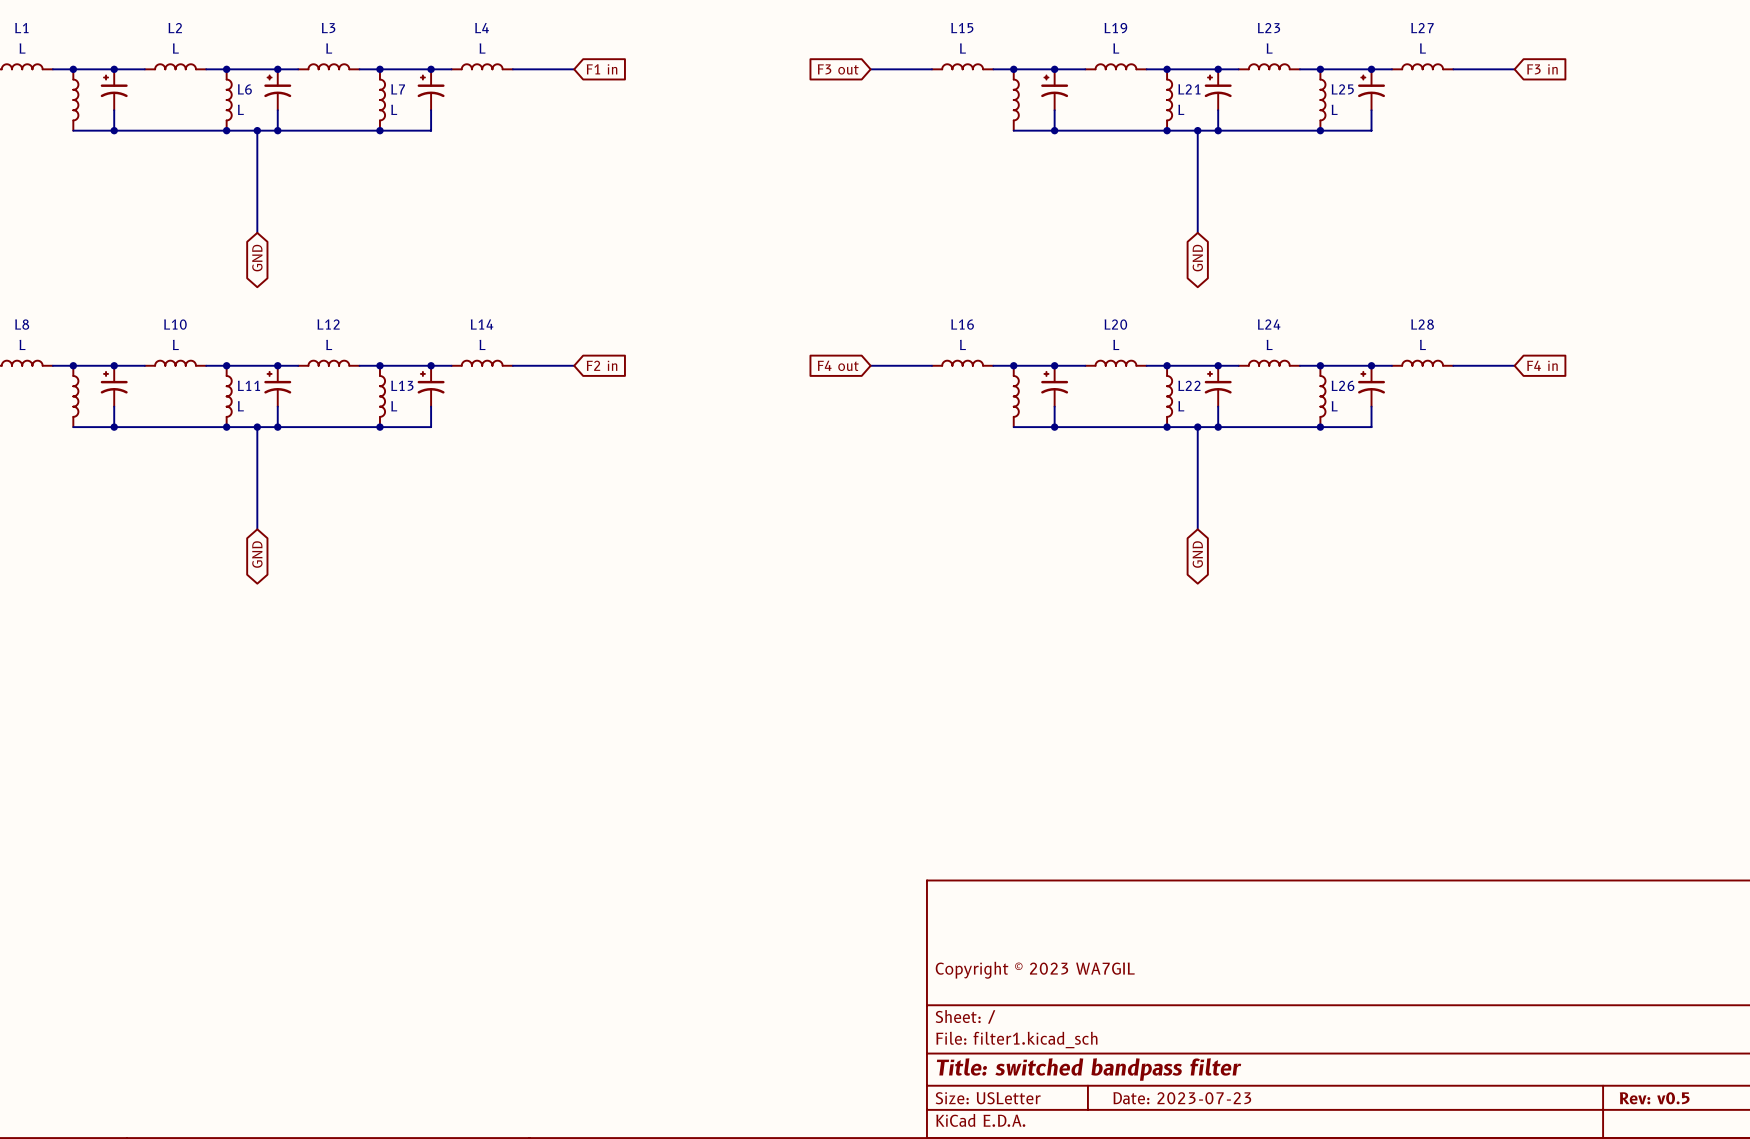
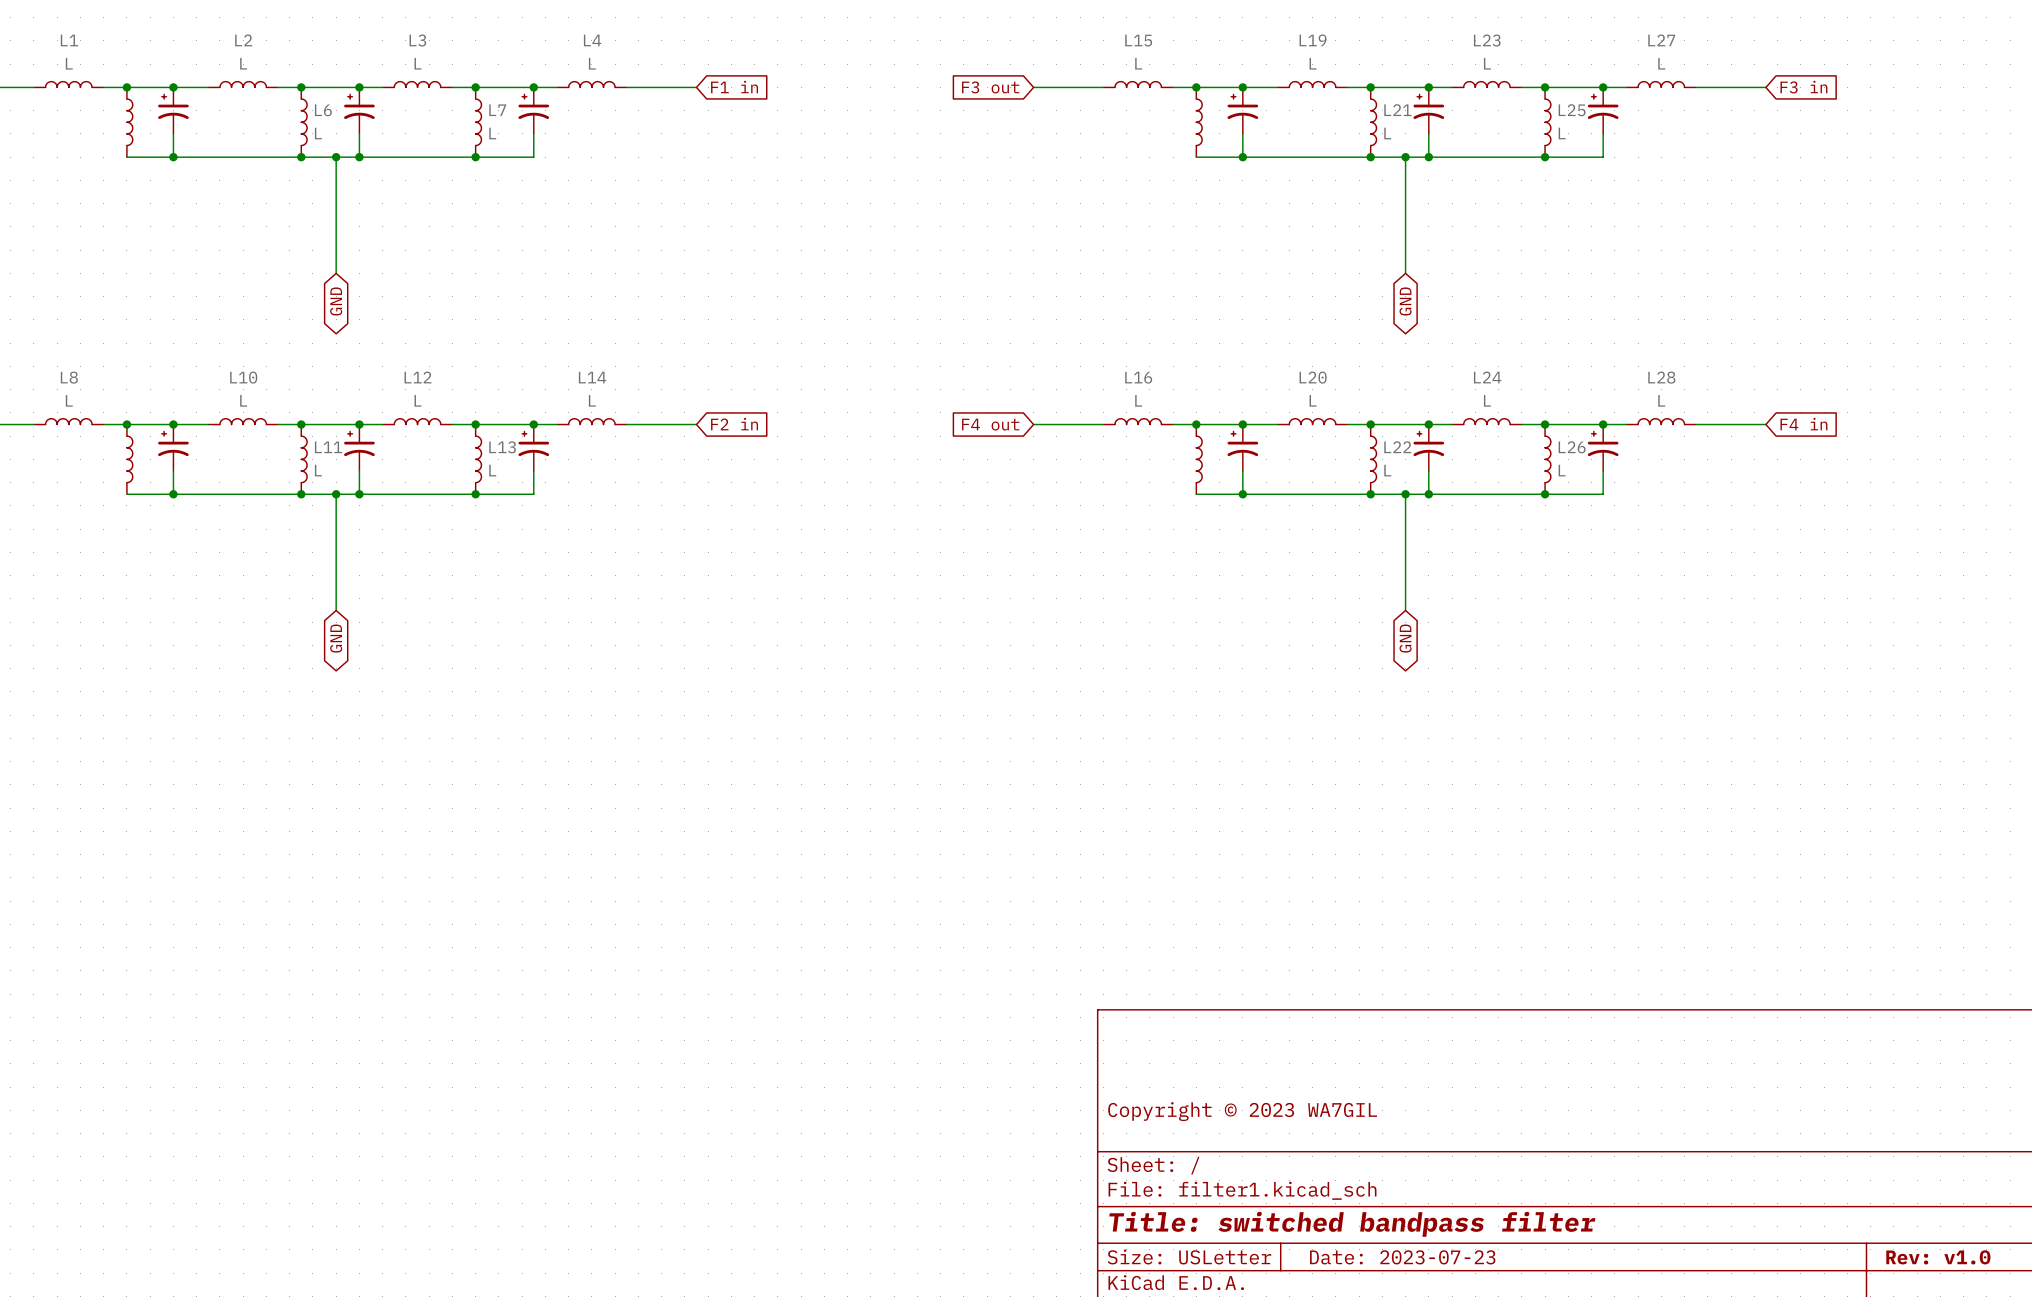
title block: Rev: v0.5 (1654, 1098) -> Rev: v1.0 (1938, 1257)

